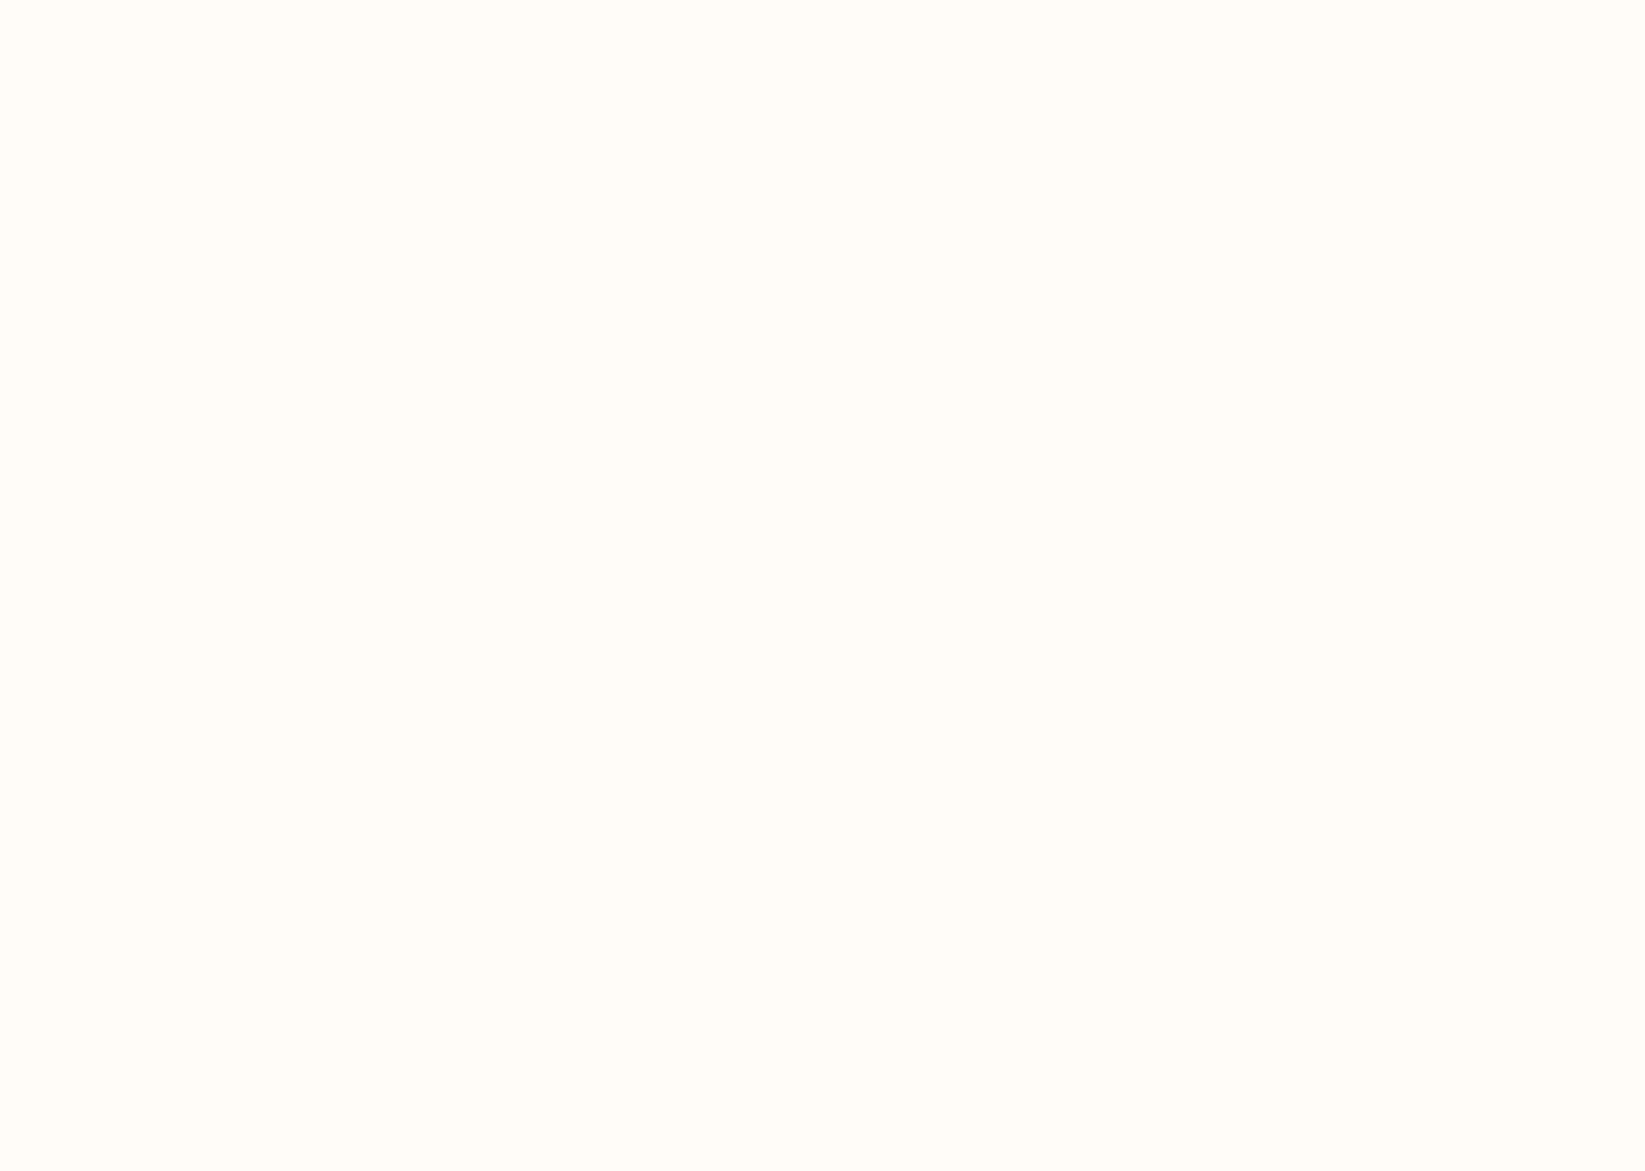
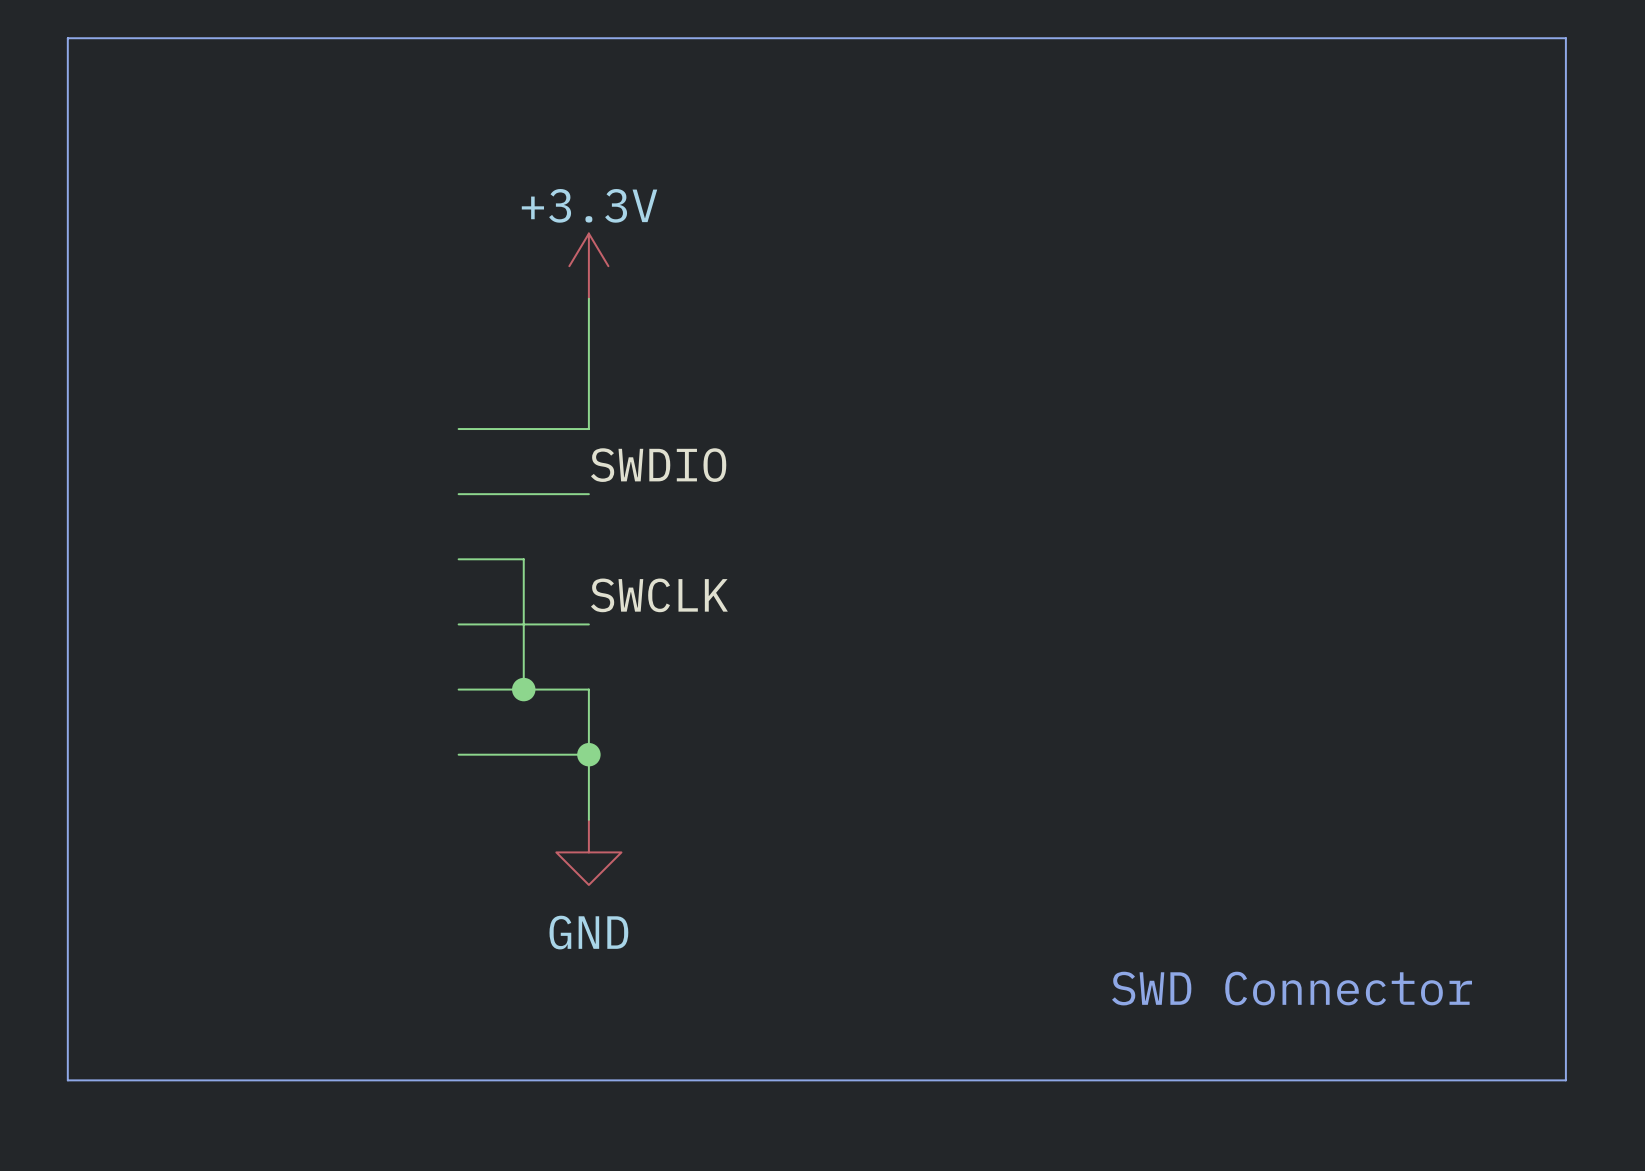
line: none -> (67, 38) (67, 1080) (1565, 1080) (1565, 38) (67, 38)
power symbol: none -> +3.3V (588, 266)
wire: none -> (588, 298) (588, 429) (458, 429)
label: none -> SWDIO (658, 465)
wire: none -> (458, 494) (588, 494)
wire: none -> (458, 559) (523, 559) (523, 689)
label: none -> SWCLK (659, 595)
wire: none -> (458, 624) (588, 624)
wire: none -> (458, 689) (588, 689) (588, 819)
junction: none -> (523, 689)
wire: none -> (458, 754) (588, 754)
junction: none -> (588, 754)
power symbol: none -> GND (588, 852)
text: none -> SWD Connector (1292, 988)

